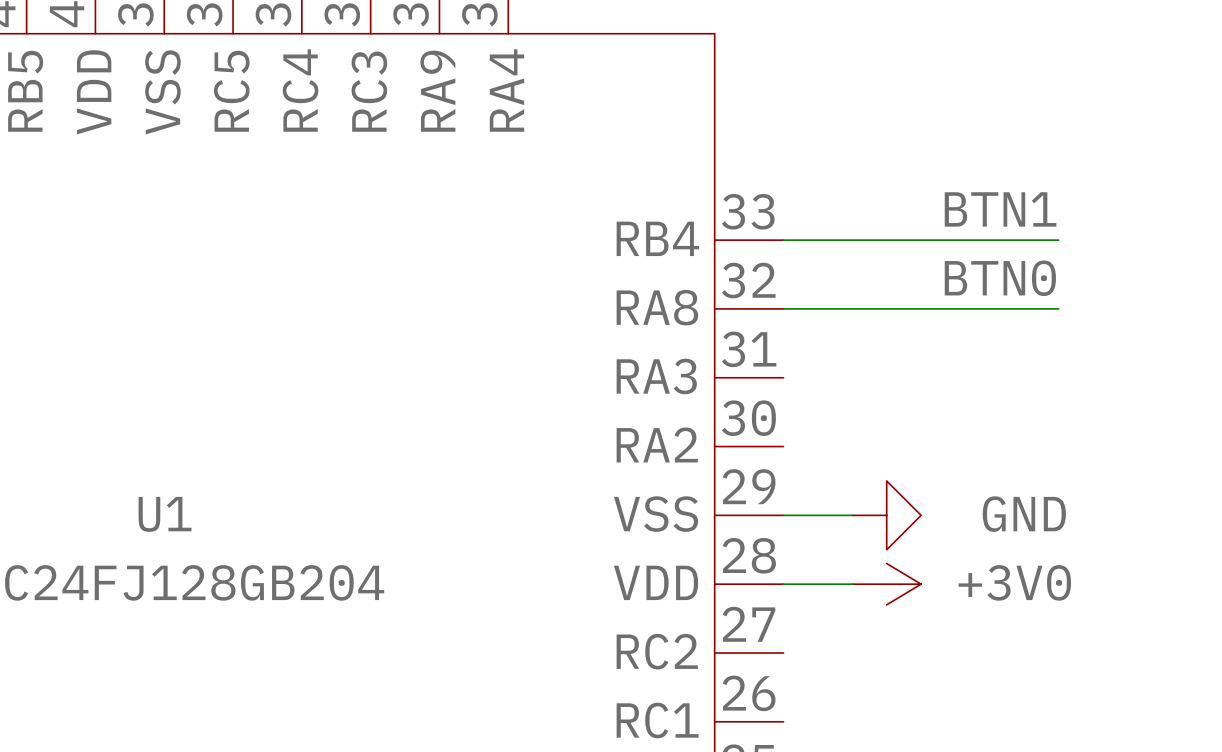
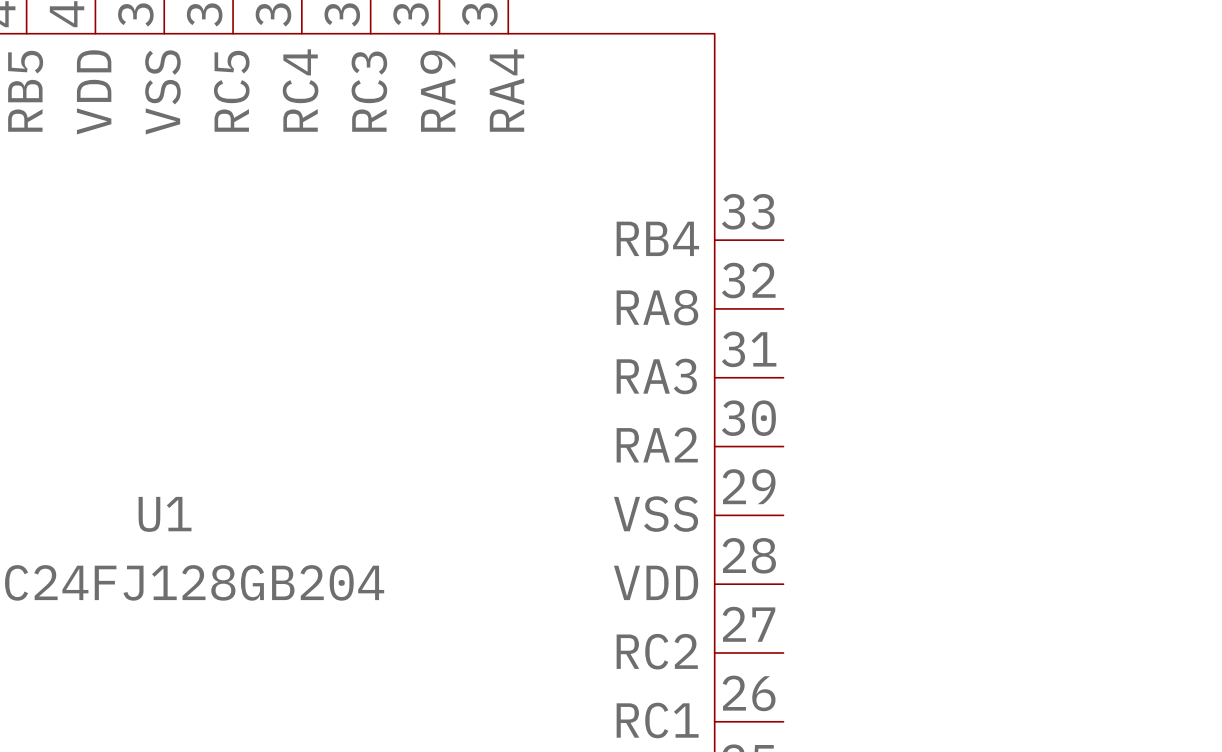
label: BTN1 (1000, 209) -> none
wire: (783, 240) (1058, 240) -> none
label: BTN0 (1000, 278) -> none
wire: (783, 308) (1058, 308) -> none
wire: (783, 515) (852, 515) -> none
power symbol: GND (886, 515) -> none
wire: (783, 584) (852, 584) -> none
power symbol: +3V0 (886, 584) -> none

